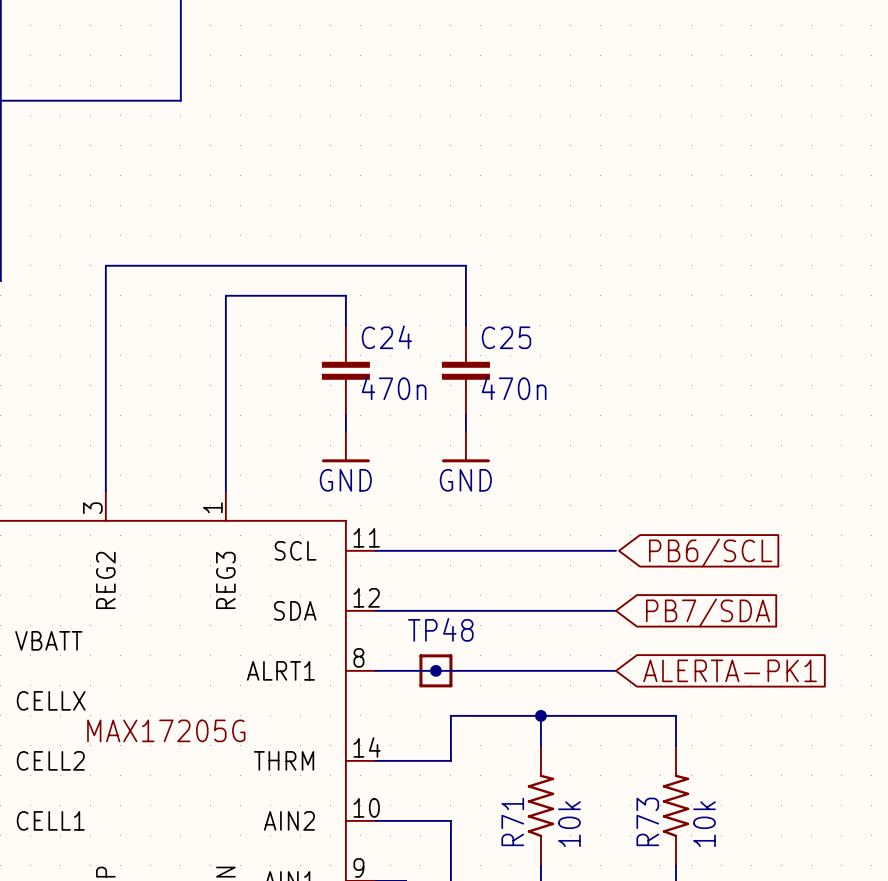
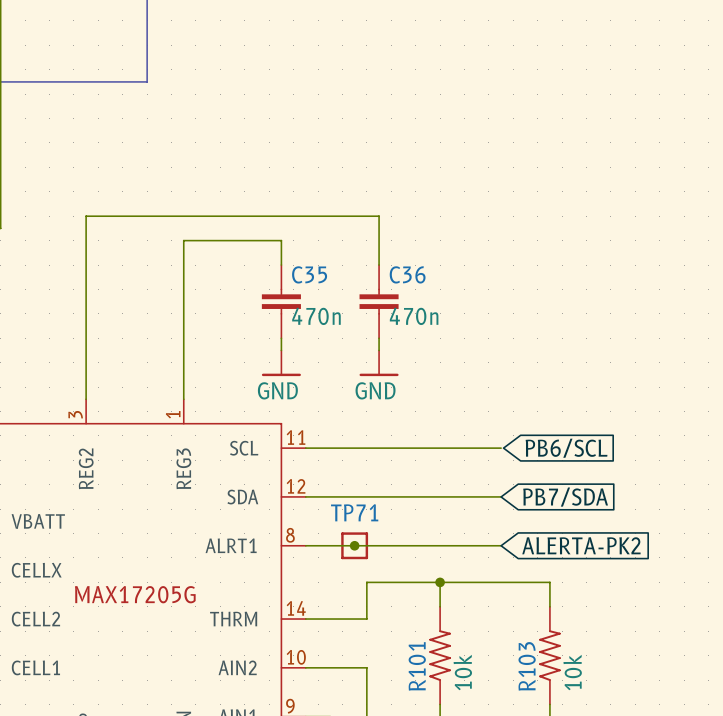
C24 name: C24 (386, 337) -> C35 (309, 274)
C25 name: C25 (506, 337) -> C36 (407, 274)
TP48 name: TP48 (440, 629) -> TP71 (354, 512)
global label: ALERTA-PK1 (730, 670) -> ALERTA-PK2 (581, 545)
R71 name: R71 (512, 821) -> R101 (417, 666)
R73 name: R73 (647, 821) -> R103 (527, 666)

